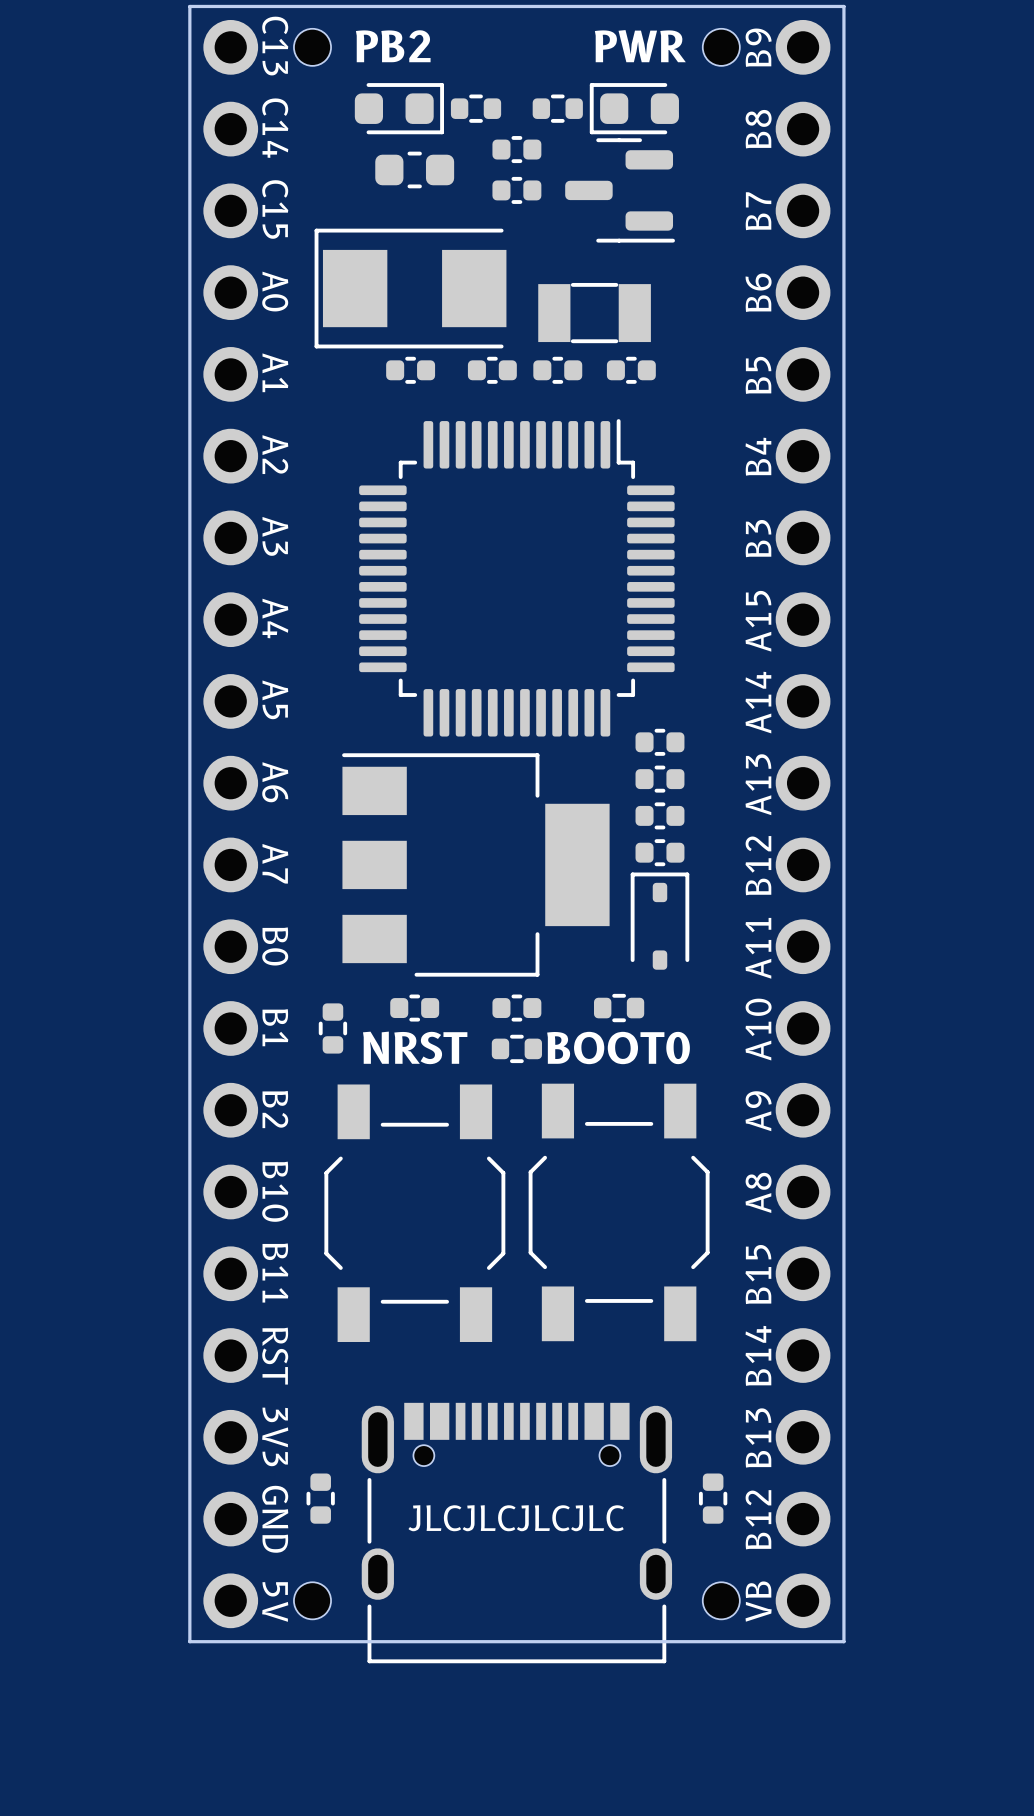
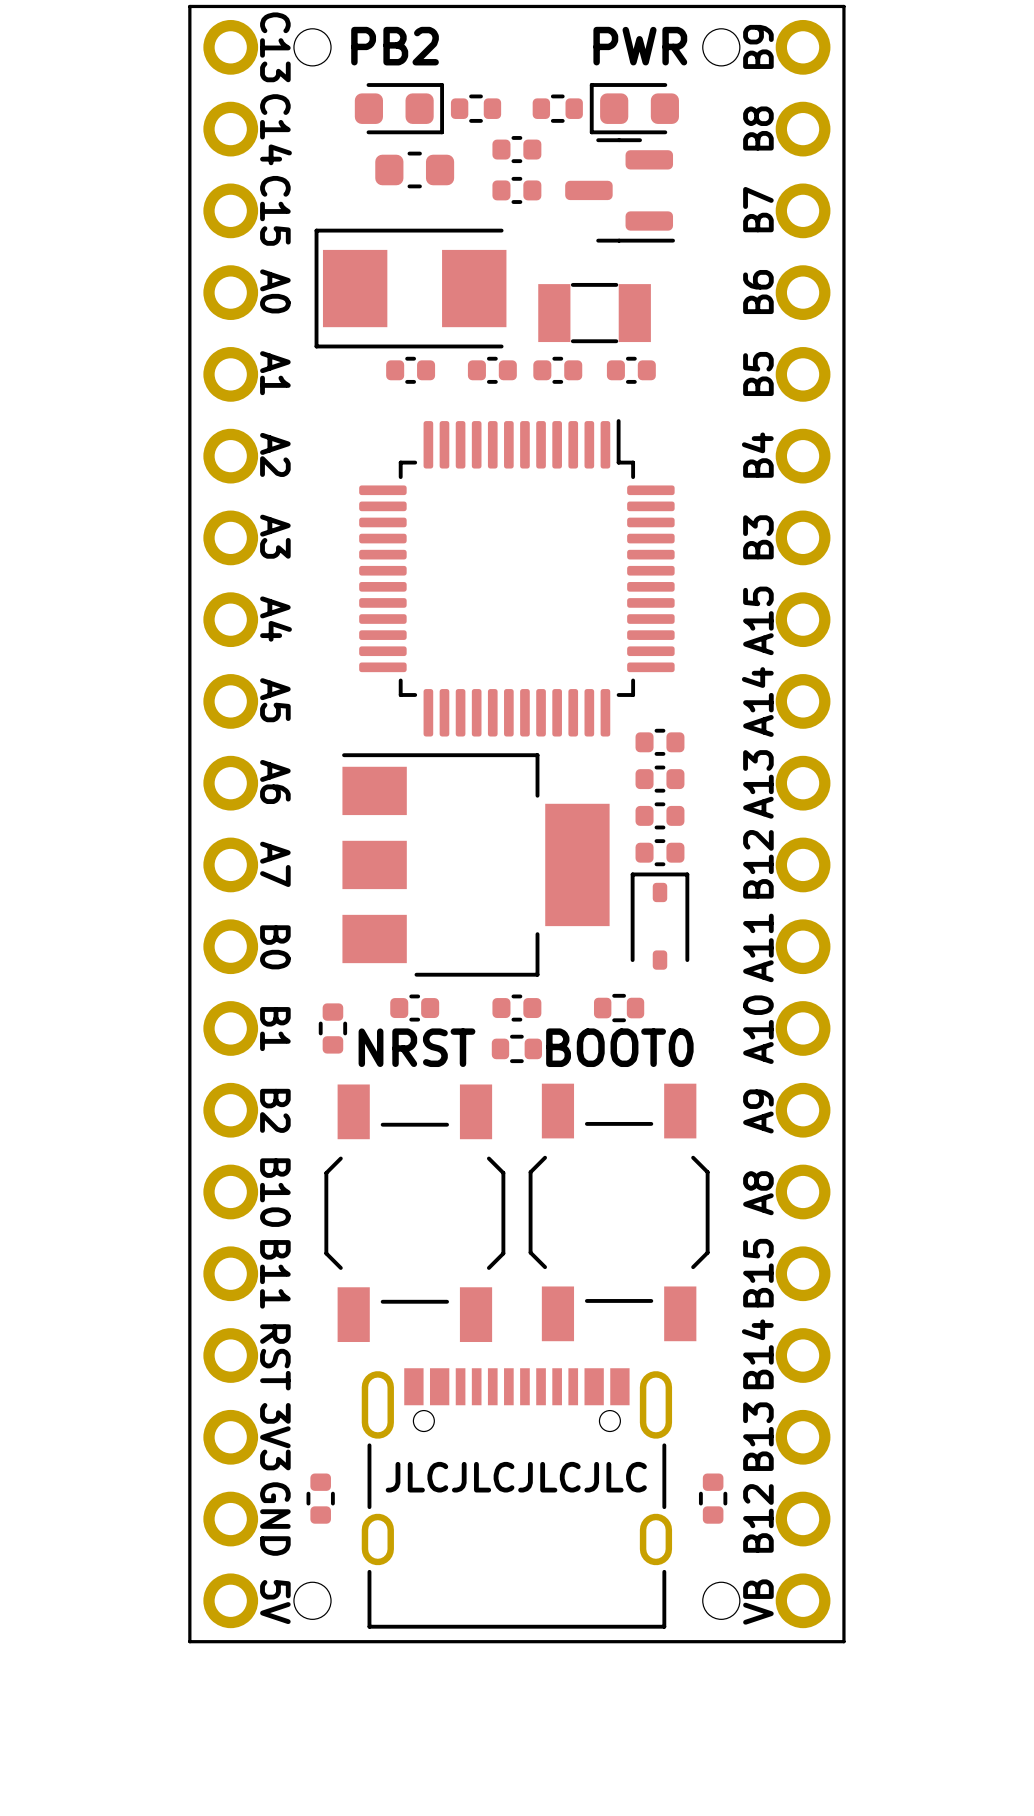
text position: JLCJLCJLCJLC (516, 1518) -> JLCJLCJLCJLC (516, 1477)
part position: (516, 1533) -> (516, 1498)

